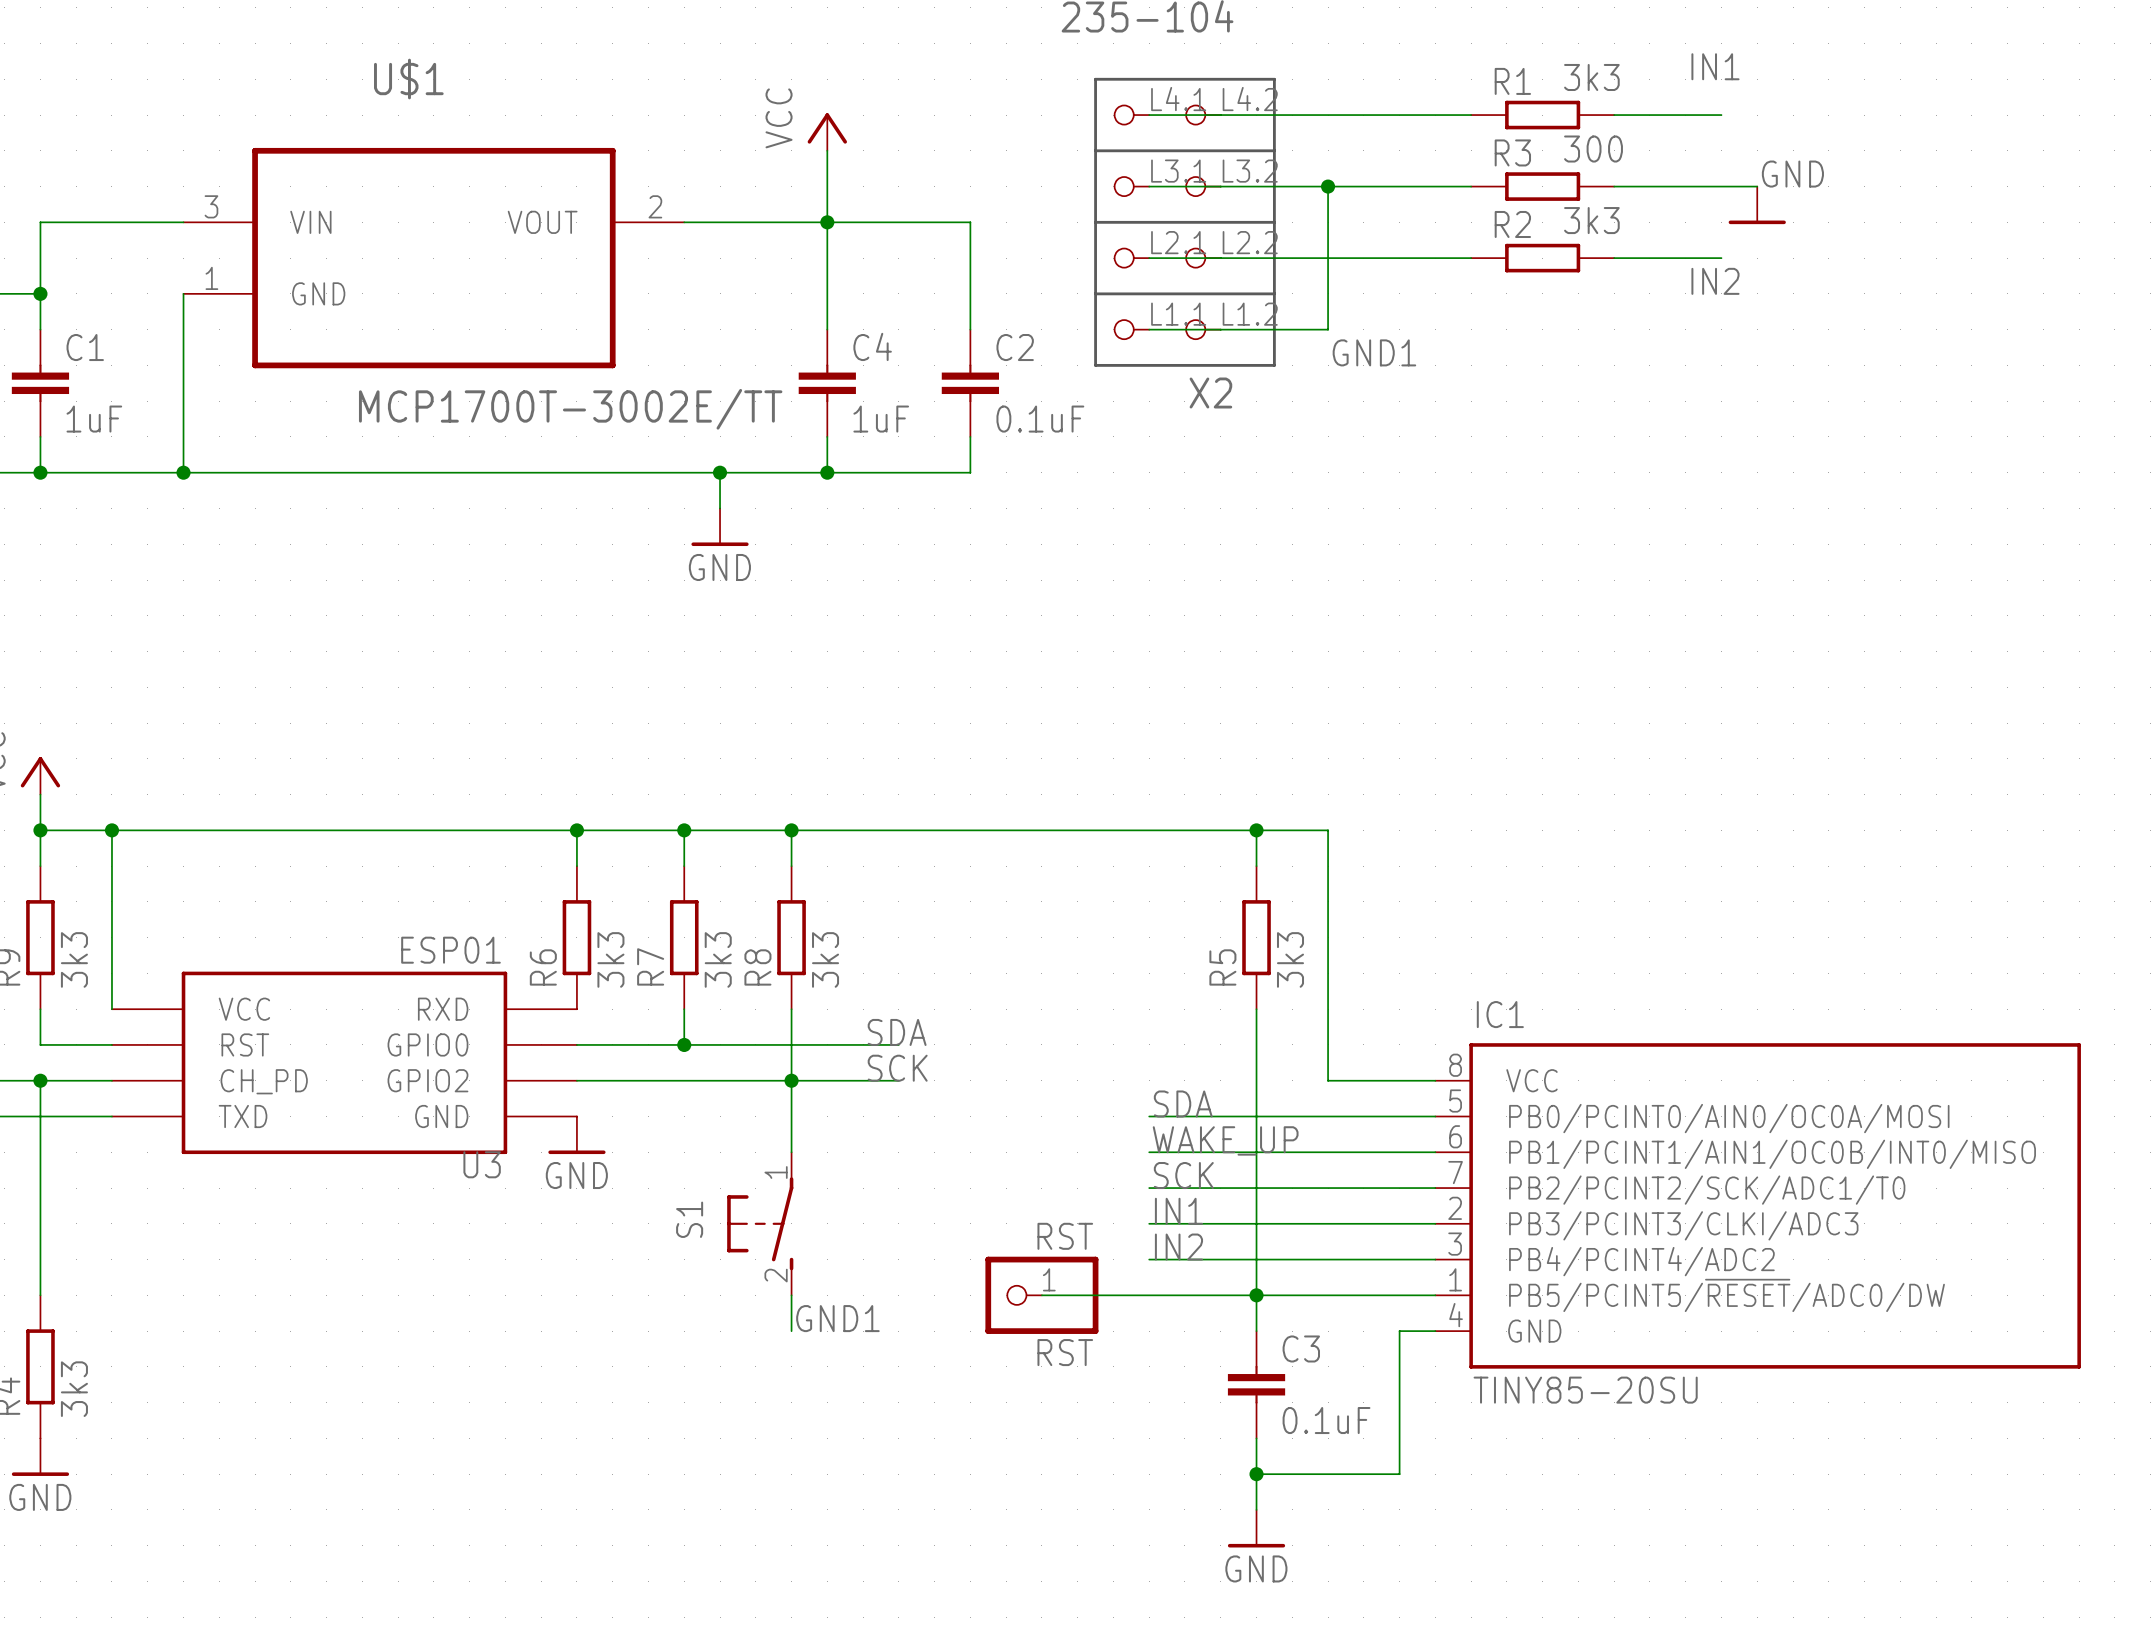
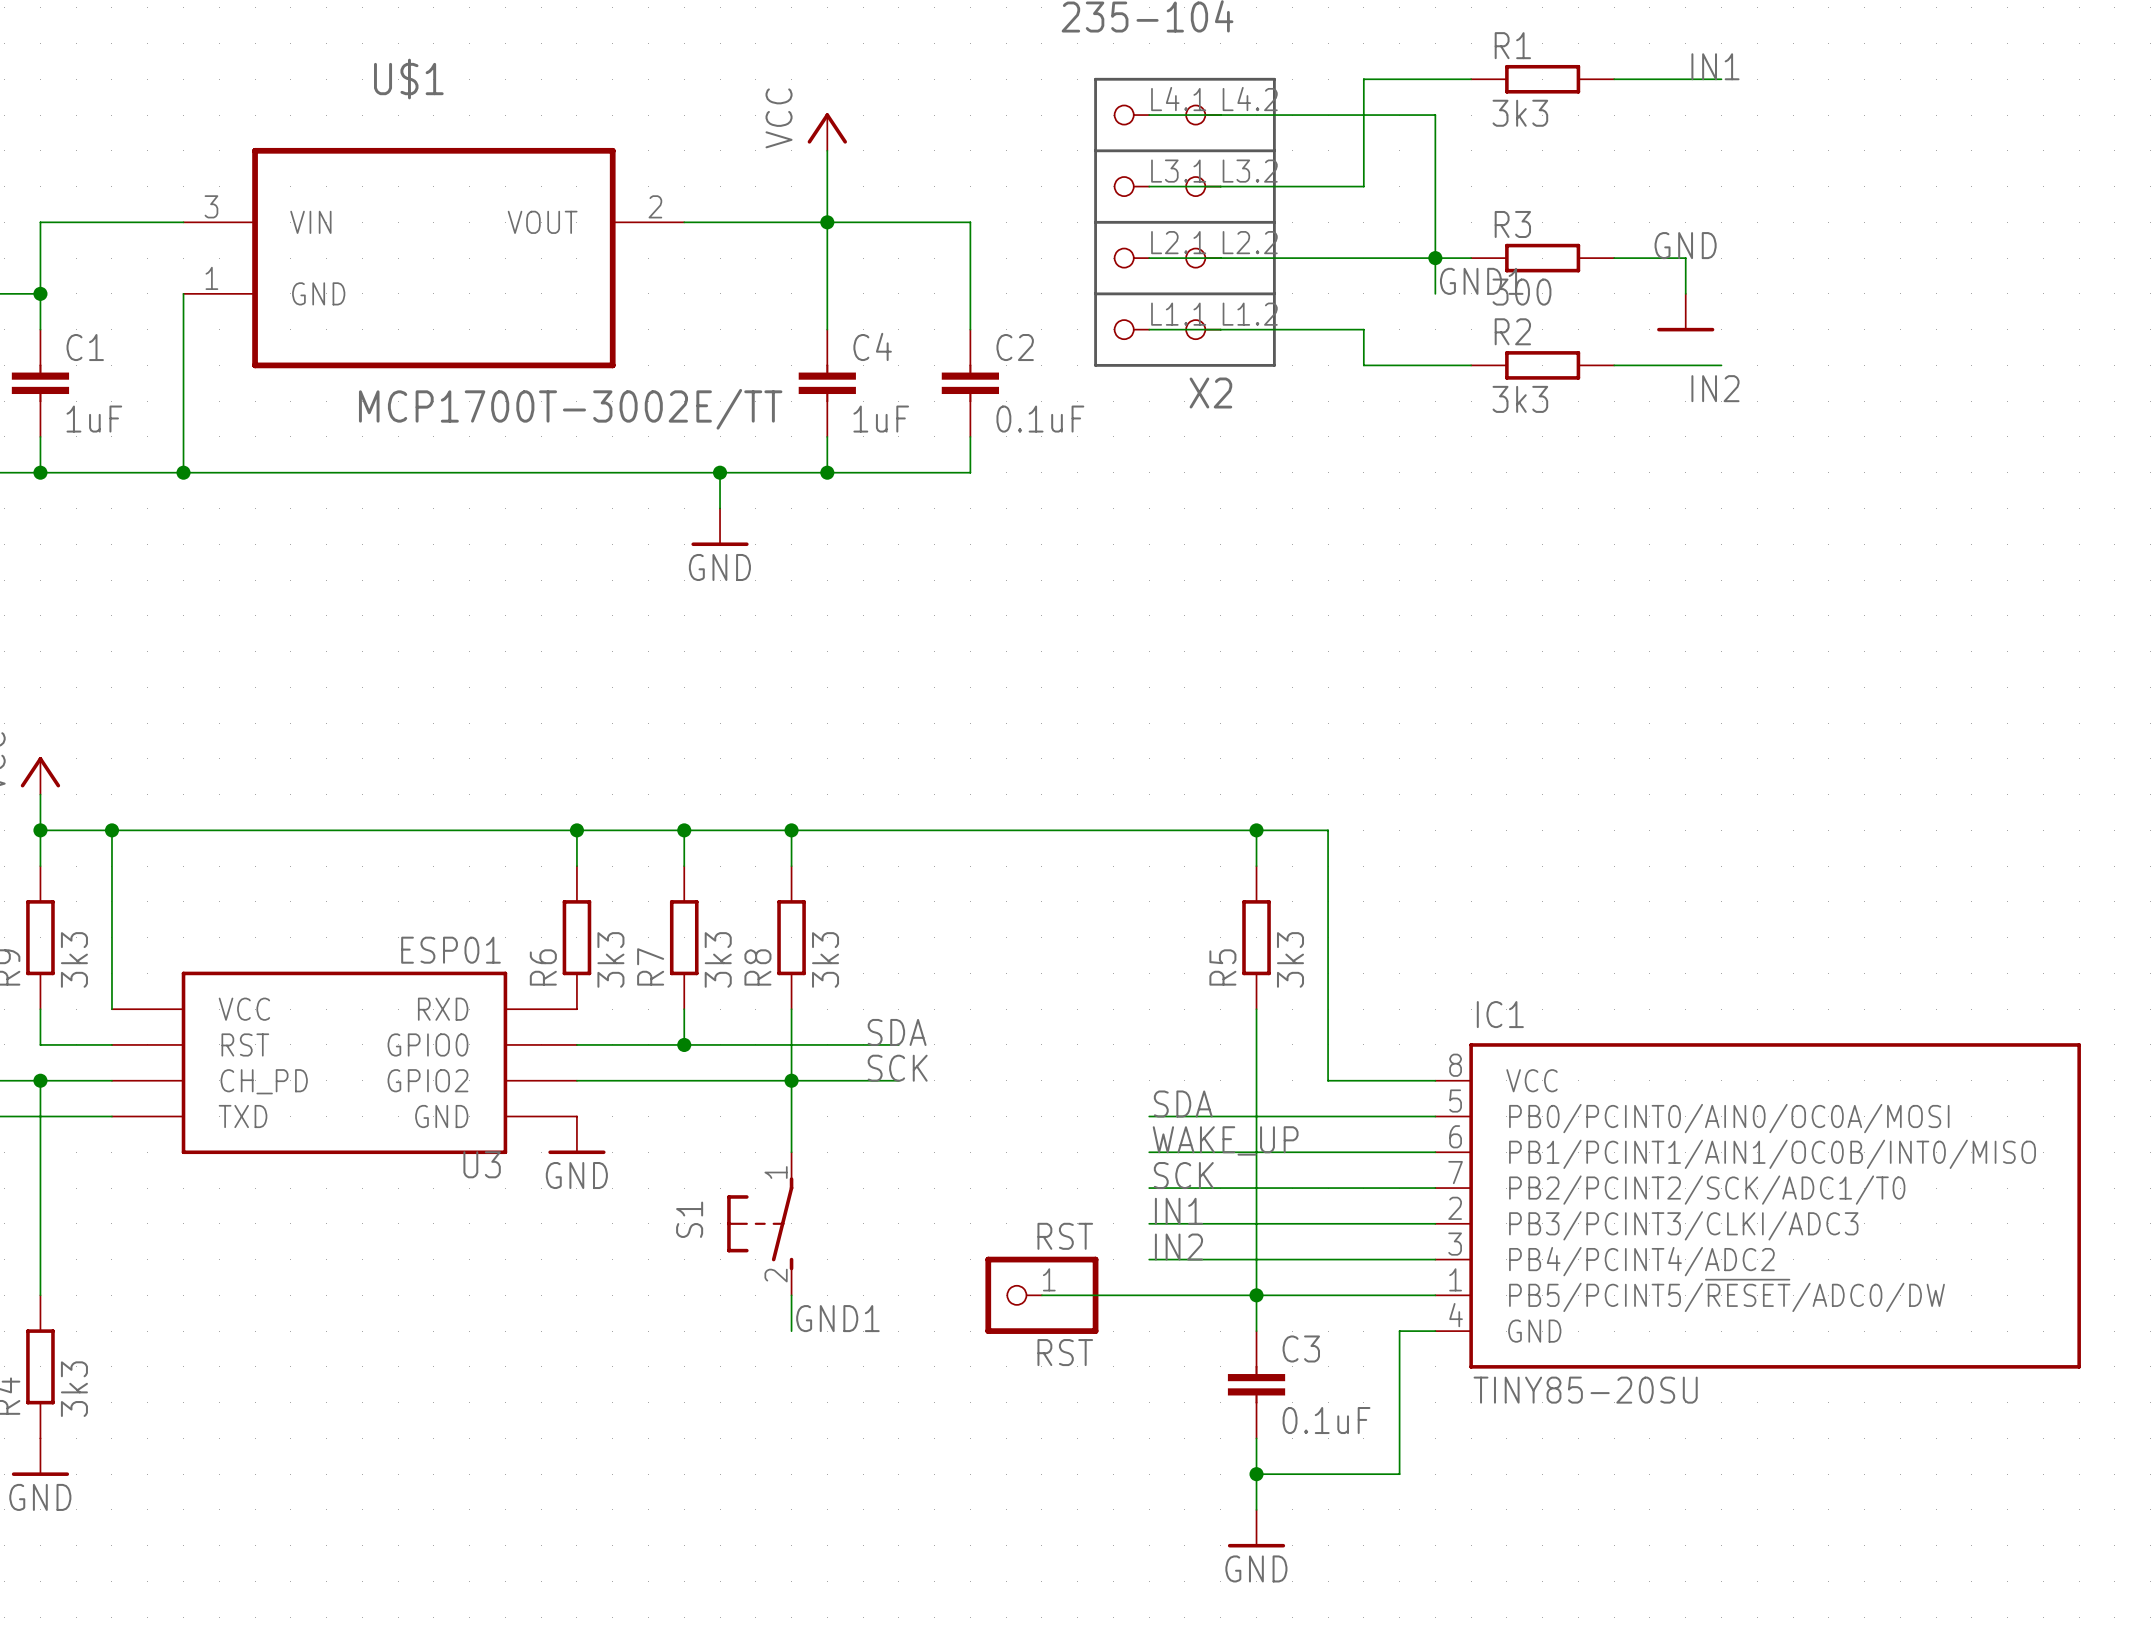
R1 value position: 3k3 (1591, 77) -> 3k3 (1520, 113)
wire: (1435, 115) (1471, 115) -> (1435, 115) (1435, 293)
R1 position: (1542, 115) -> (1542, 79)
wire: (1614, 115) (1721, 115) -> (1614, 79) (1721, 79)
power symbol text position: GND (1792, 174) -> GND (1685, 245)
wire: (1328, 186) (1328, 329) -> (1471, 365) (1363, 365) (1363, 329) (1328, 329)
junction: (1328, 186) -> none
wire: (1363, 186) (1471, 186) -> (1363, 186) (1363, 79) (1471, 79)
R3: 300 (1542, 186) -> none
wire: (1614, 186) (1757, 186) -> none
power symbol position: GND (1757, 205) -> GND (1685, 312)
R2 value: 3k3 (1591, 220) -> 300 (1521, 292)
R2 name: R2 (1512, 224) -> R3 (1512, 224)
junction: none -> (1435, 258)
wire: (1685, 258) (1721, 258) -> (1685, 258) (1685, 293)
label position: IN2 (1715, 281) -> IN2 (1715, 388)
label position: GND1 (1374, 352) -> GND1 (1481, 281)
R2: none -> 3k3 (1542, 365)
wire: none -> (1614, 365) (1721, 365)

